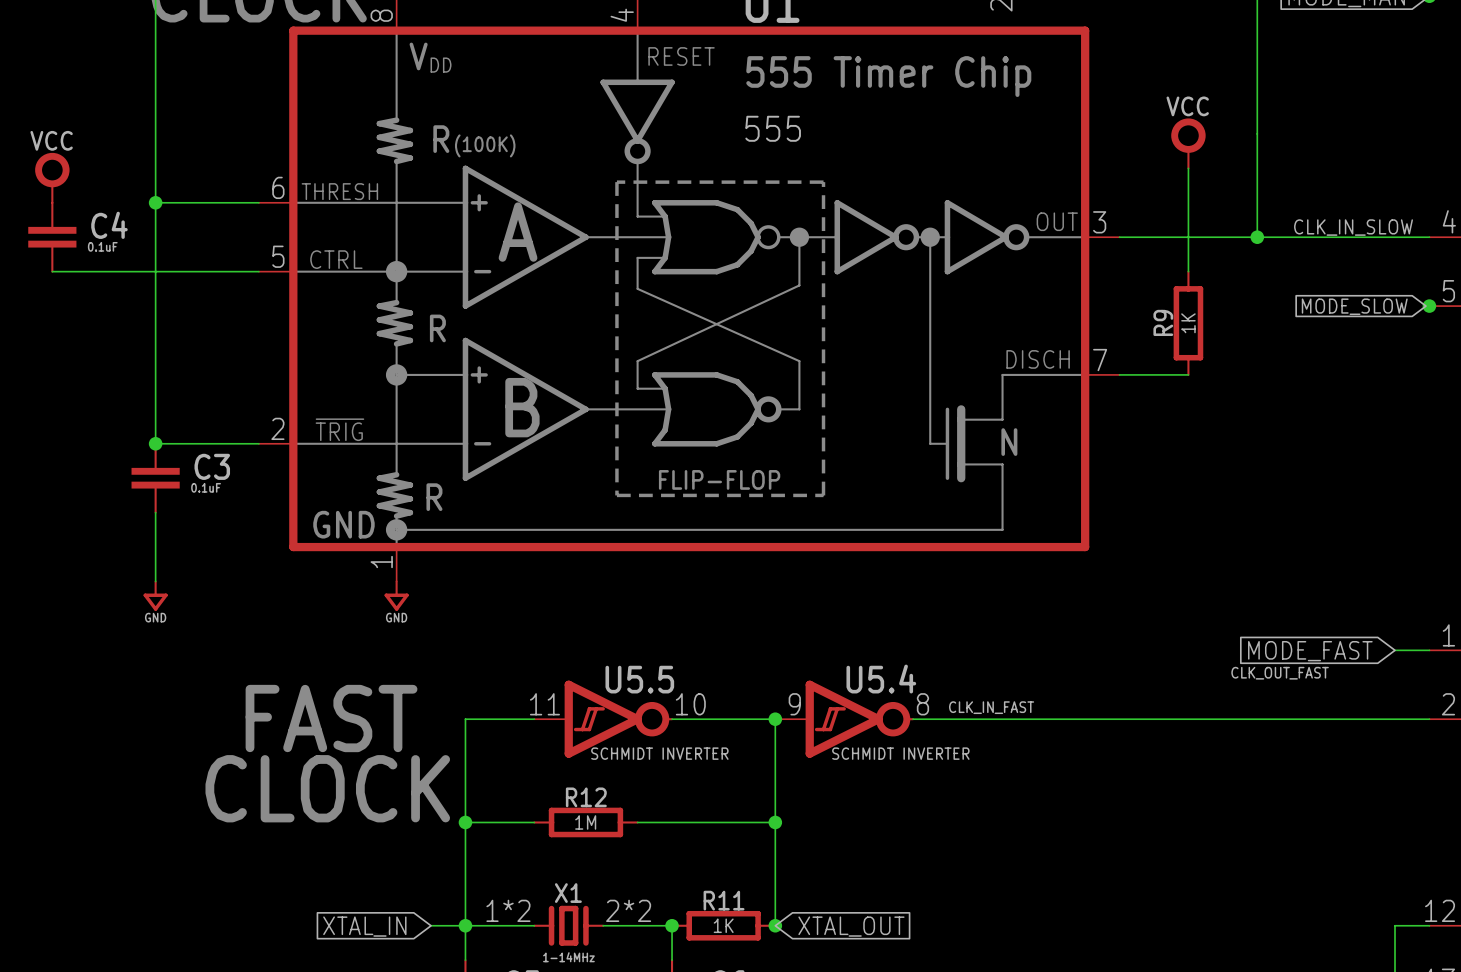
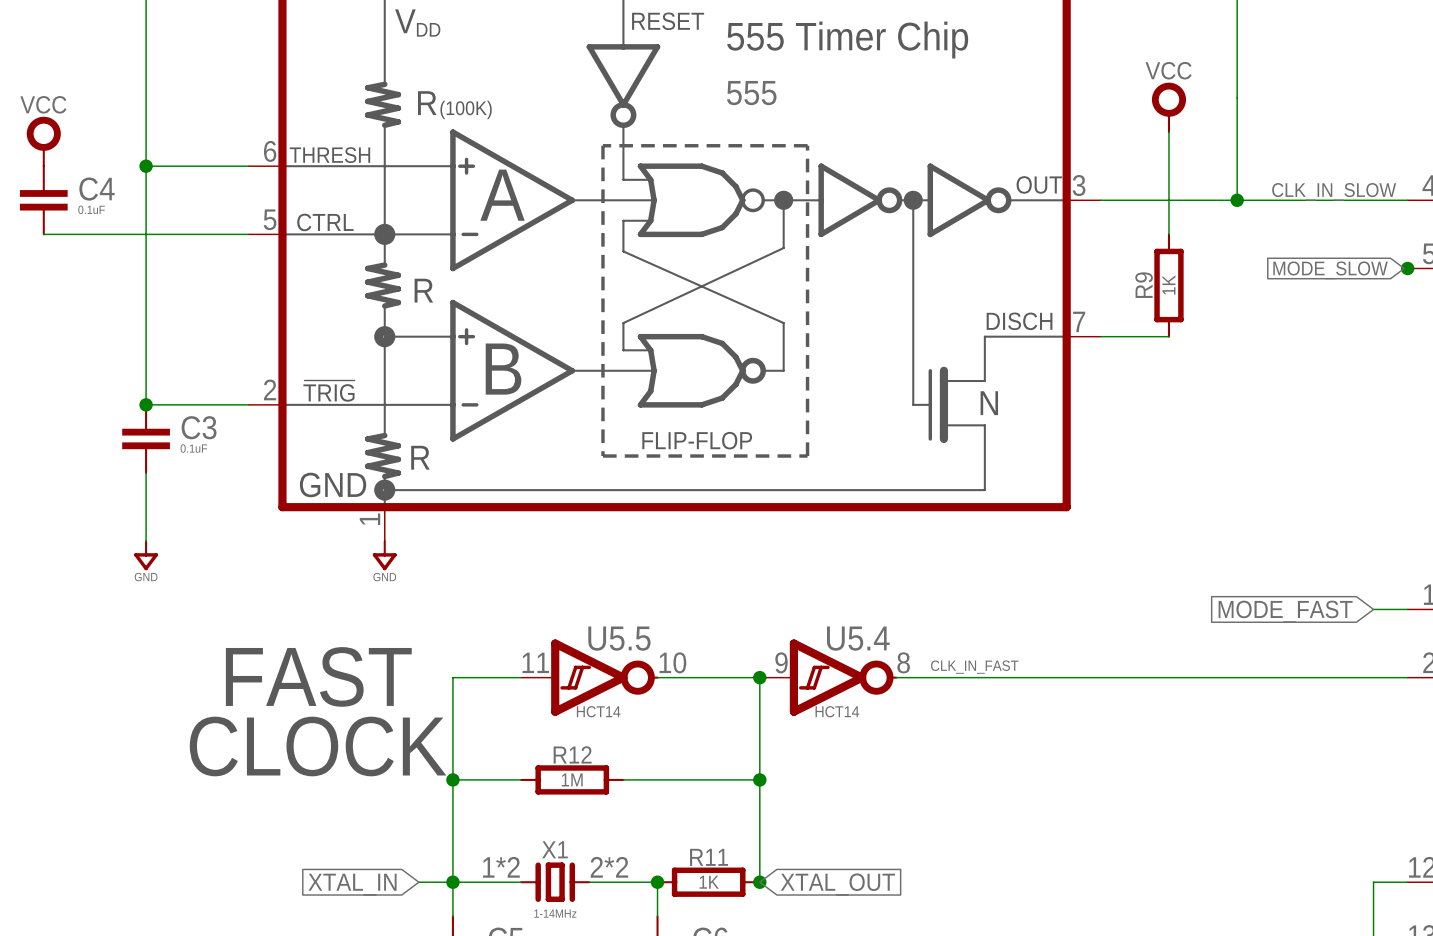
label: CLK_OUT_FAST (1280, 673) -> none
U5.5 value: SCHMIDT INVERTER (659, 753) -> HCT14 (598, 711)
U5.4 value: SCHMIDT INVERTER (900, 753) -> HCT14 (837, 711)

